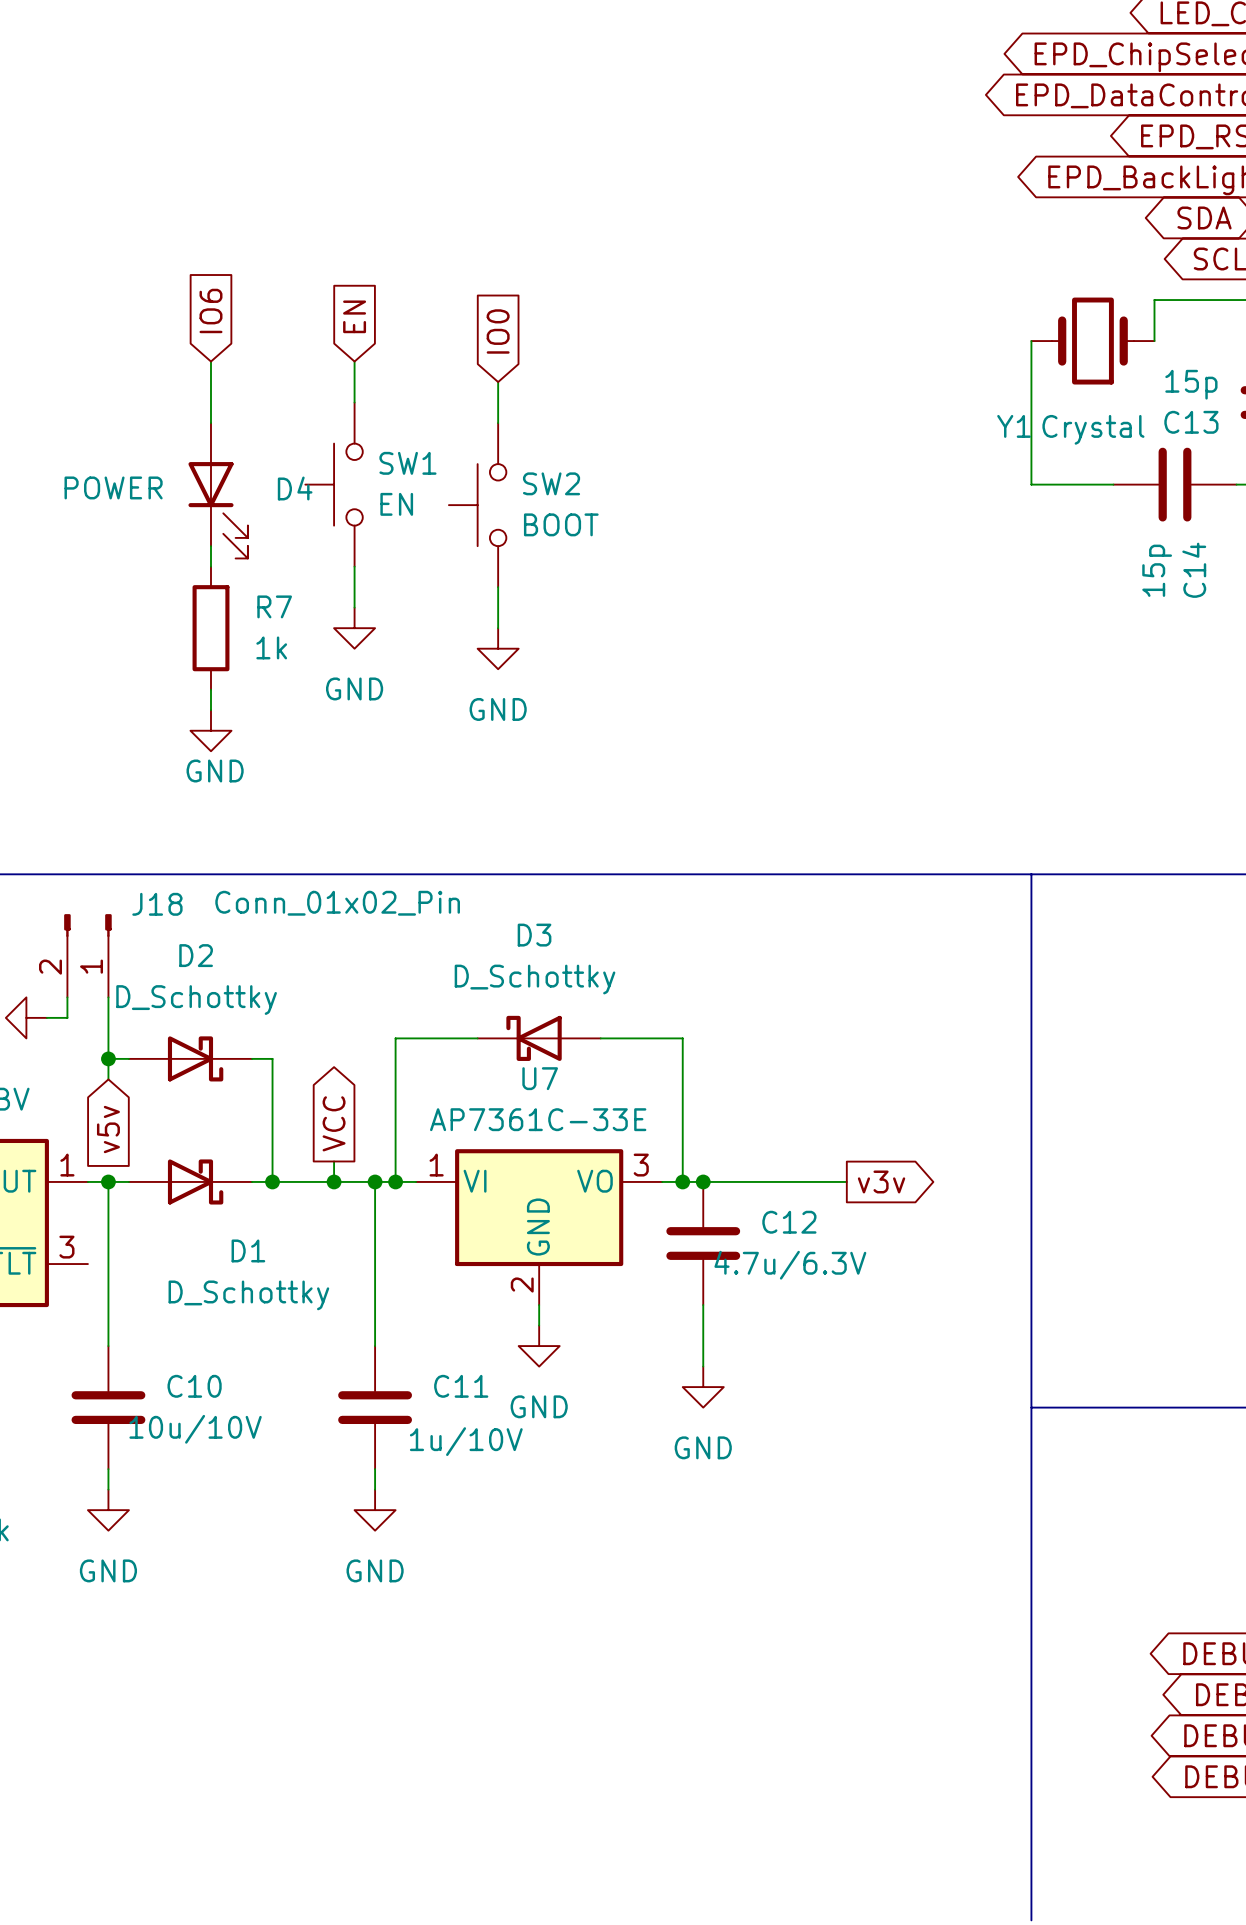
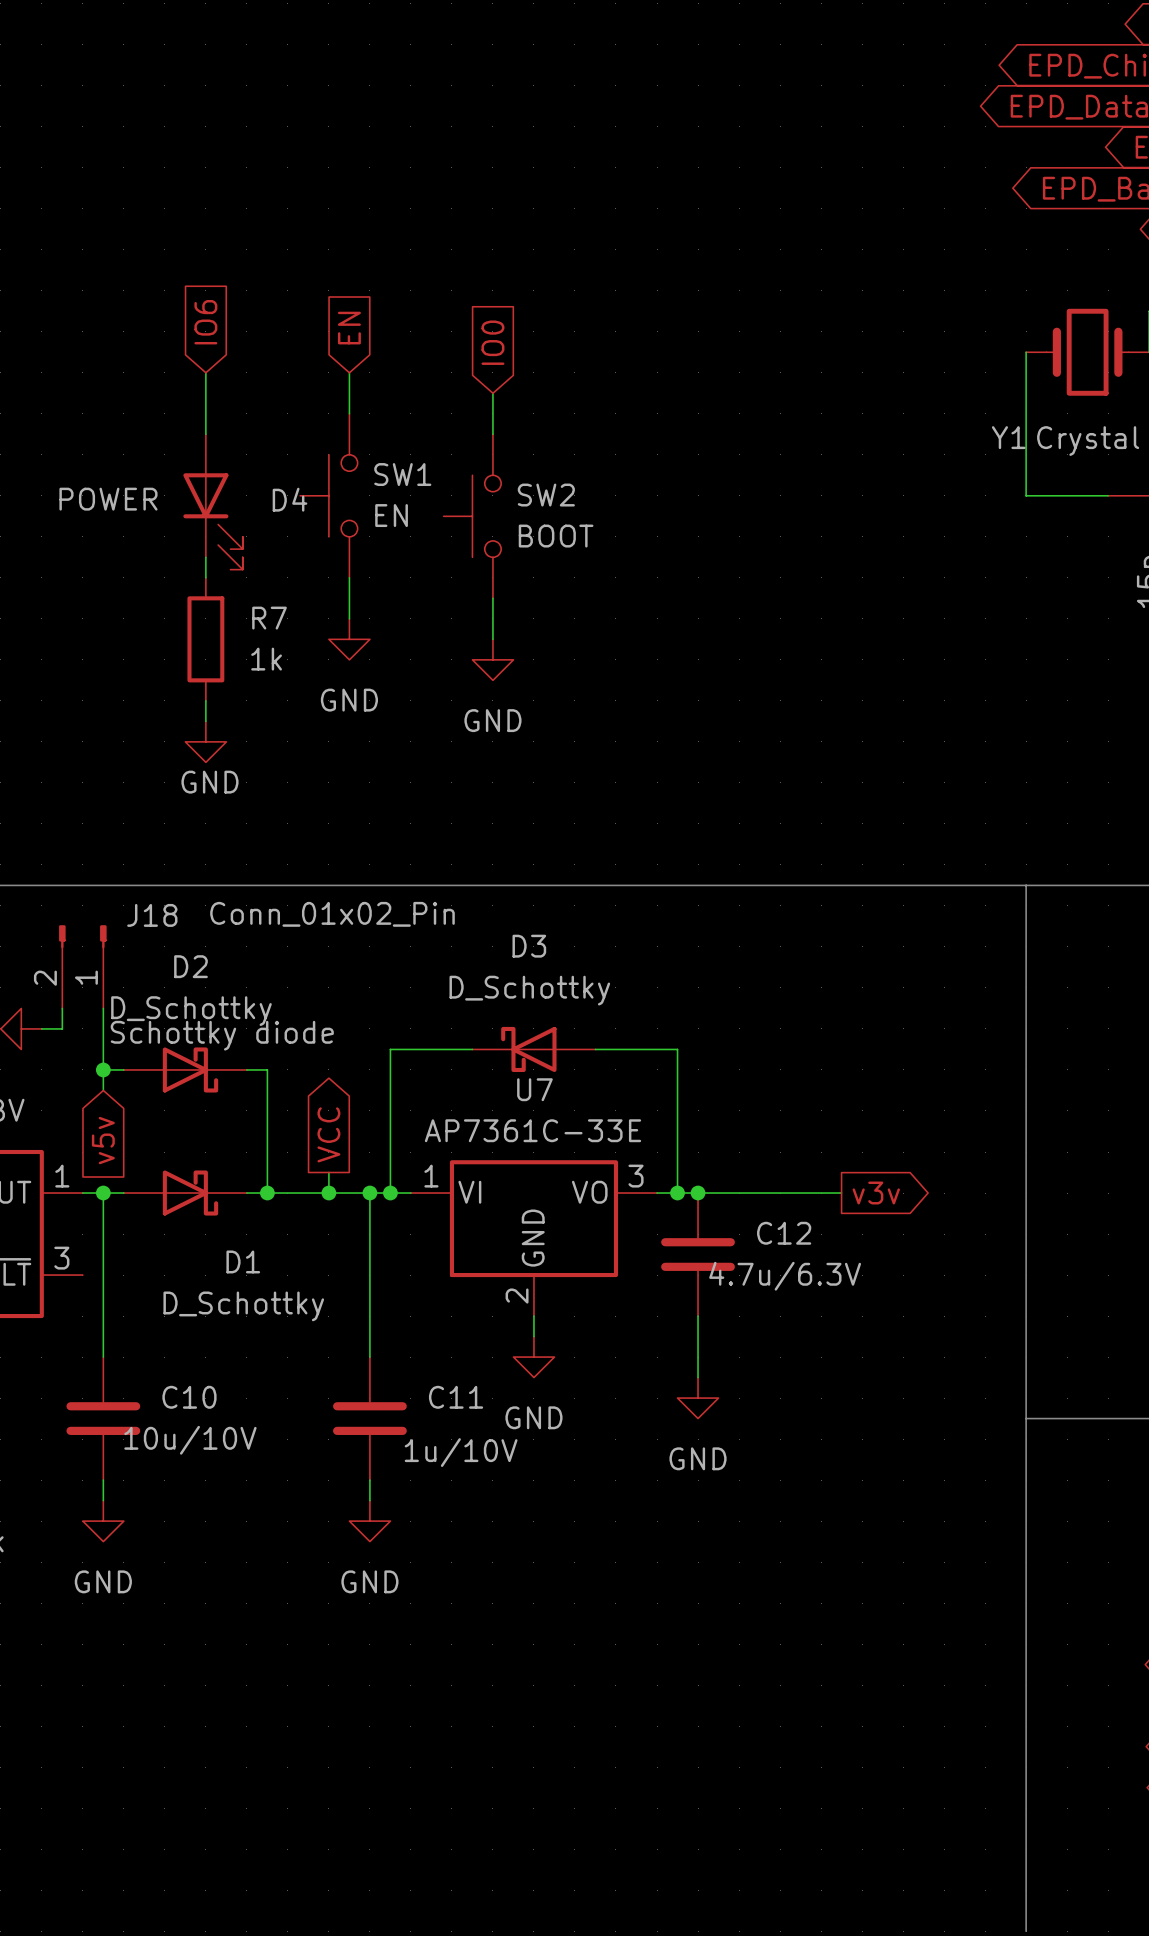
D2 text: none -> Schottky diode (222, 1035)

